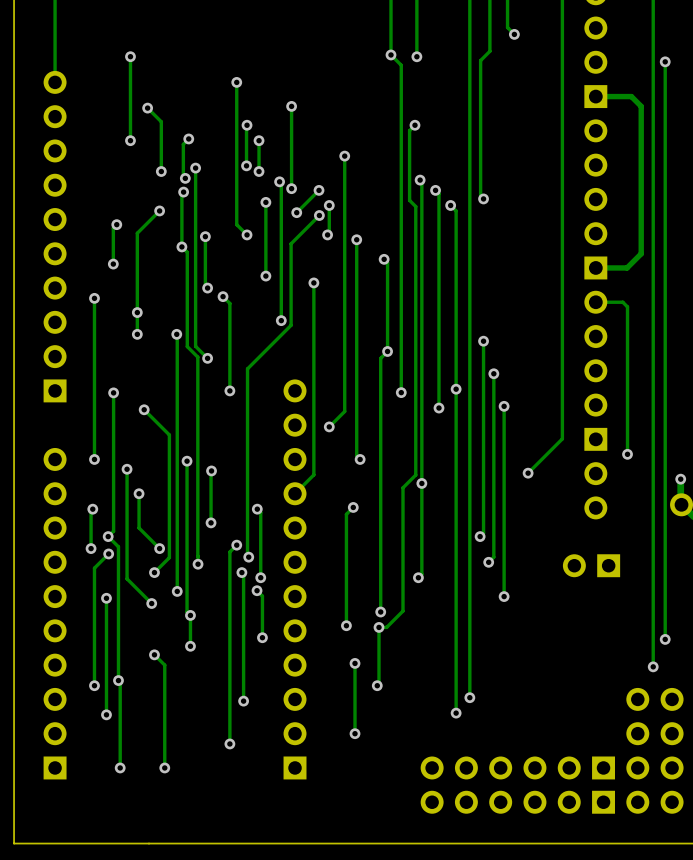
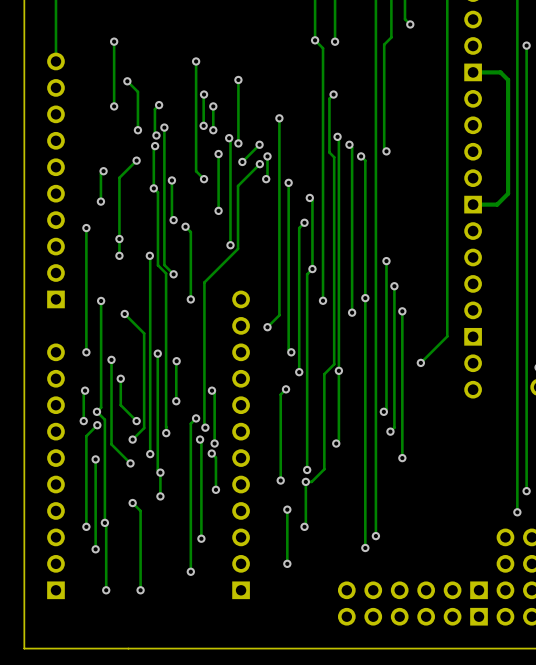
track: (313, 282) (313, 474) (295, 493) -> none
via position: (313, 282) -> (304, 222)
track: none -> (304, 222) (299, 228) (299, 372)
track: (595, 302) (622, 302) (627, 306) (627, 454) -> none
via: (627, 454) -> none
via: none -> (299, 372)
part: (591, 565) -> none

